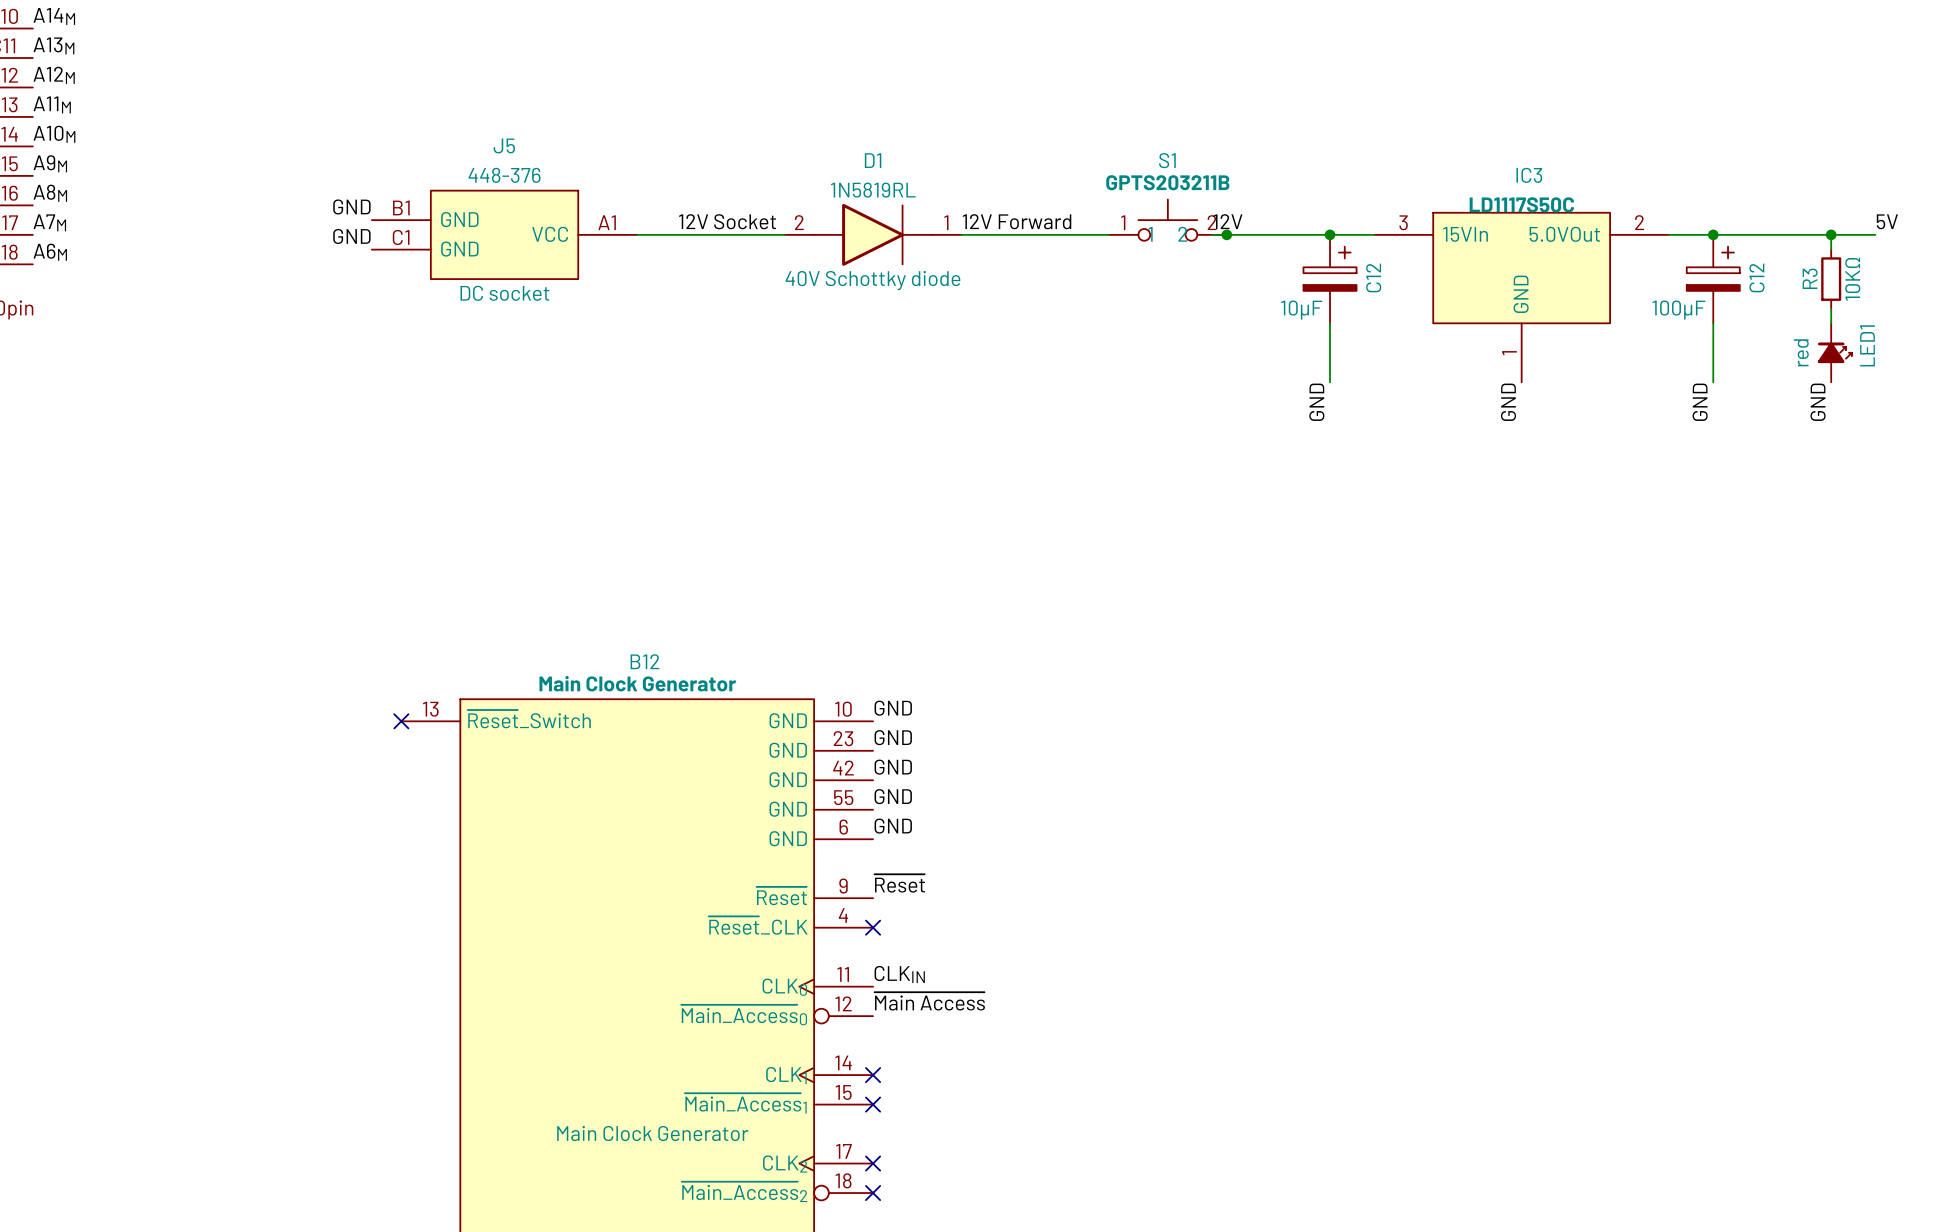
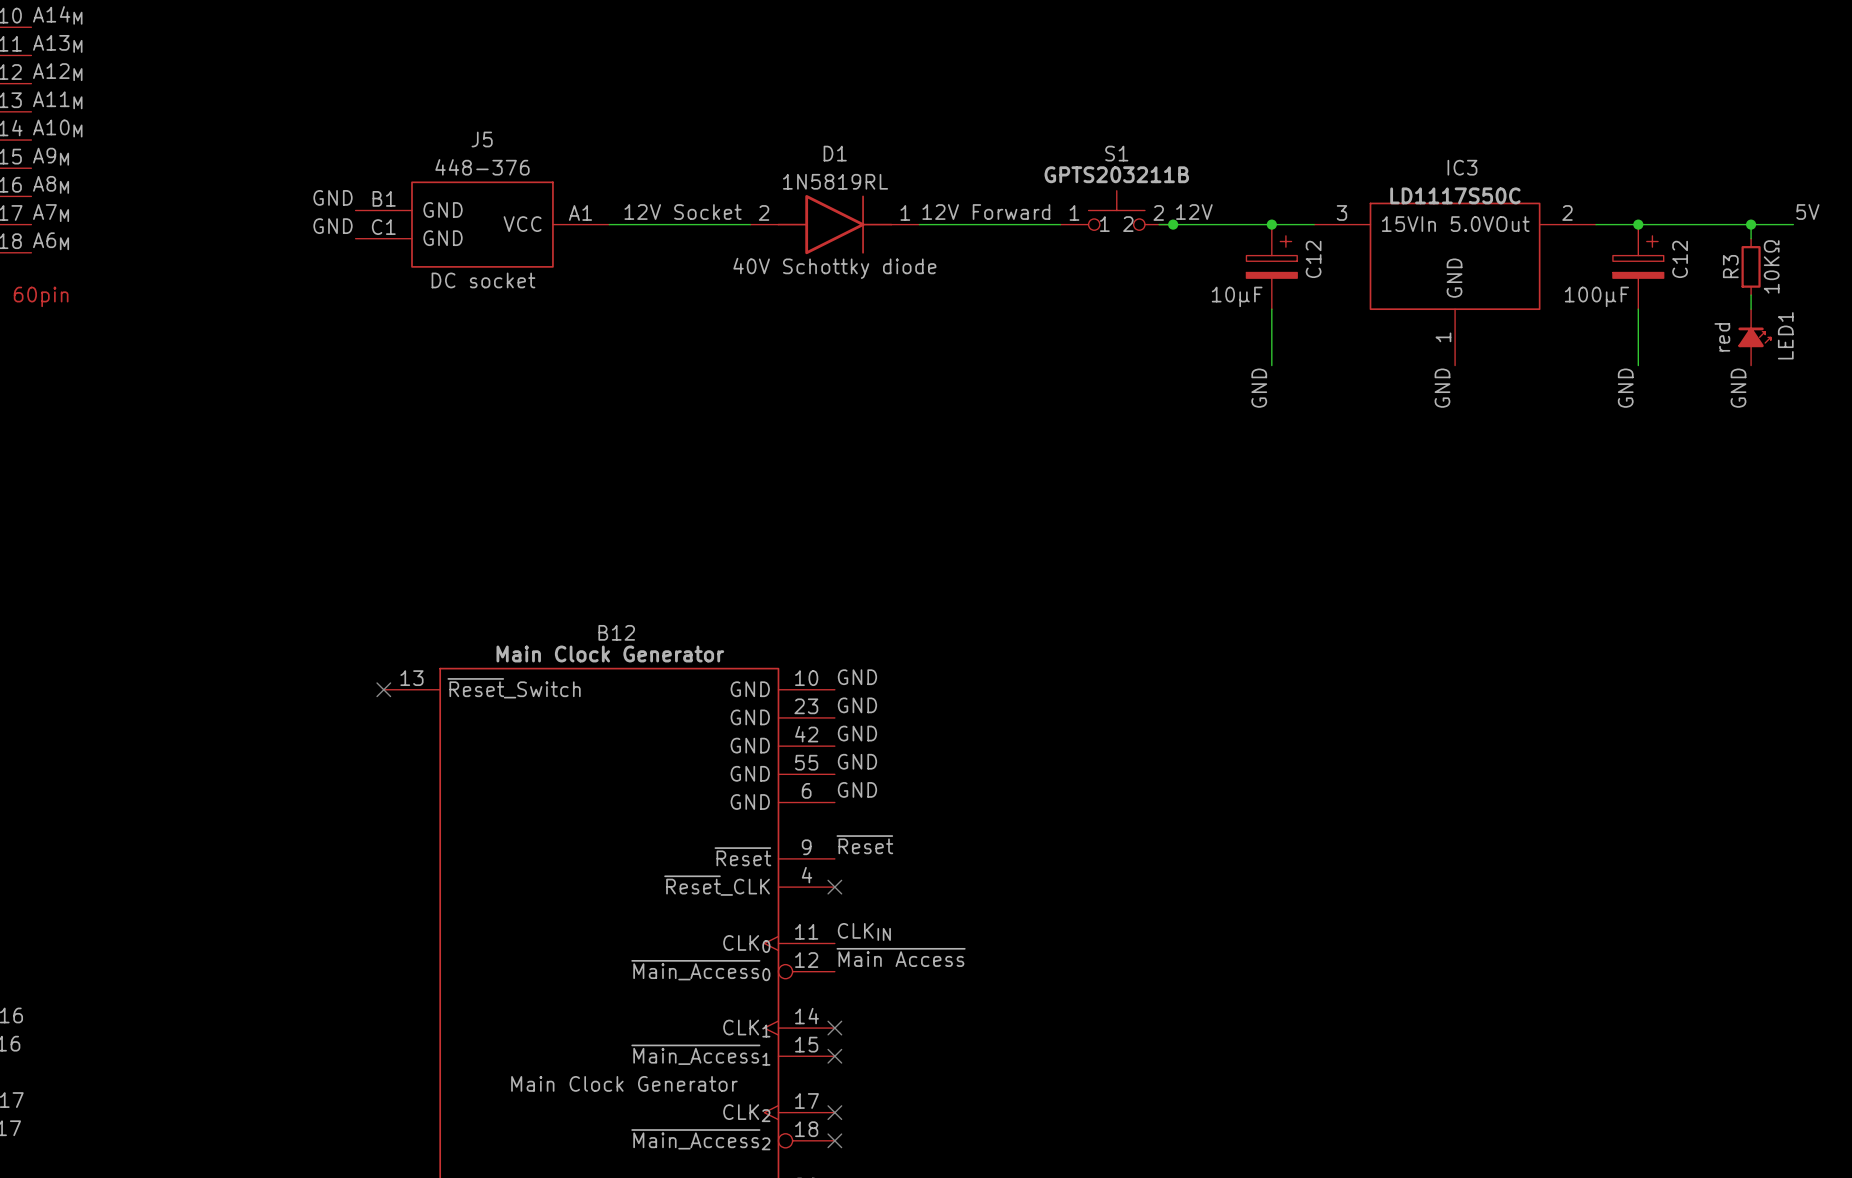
label position: 12V (1227, 221) -> 12V (1194, 212)

